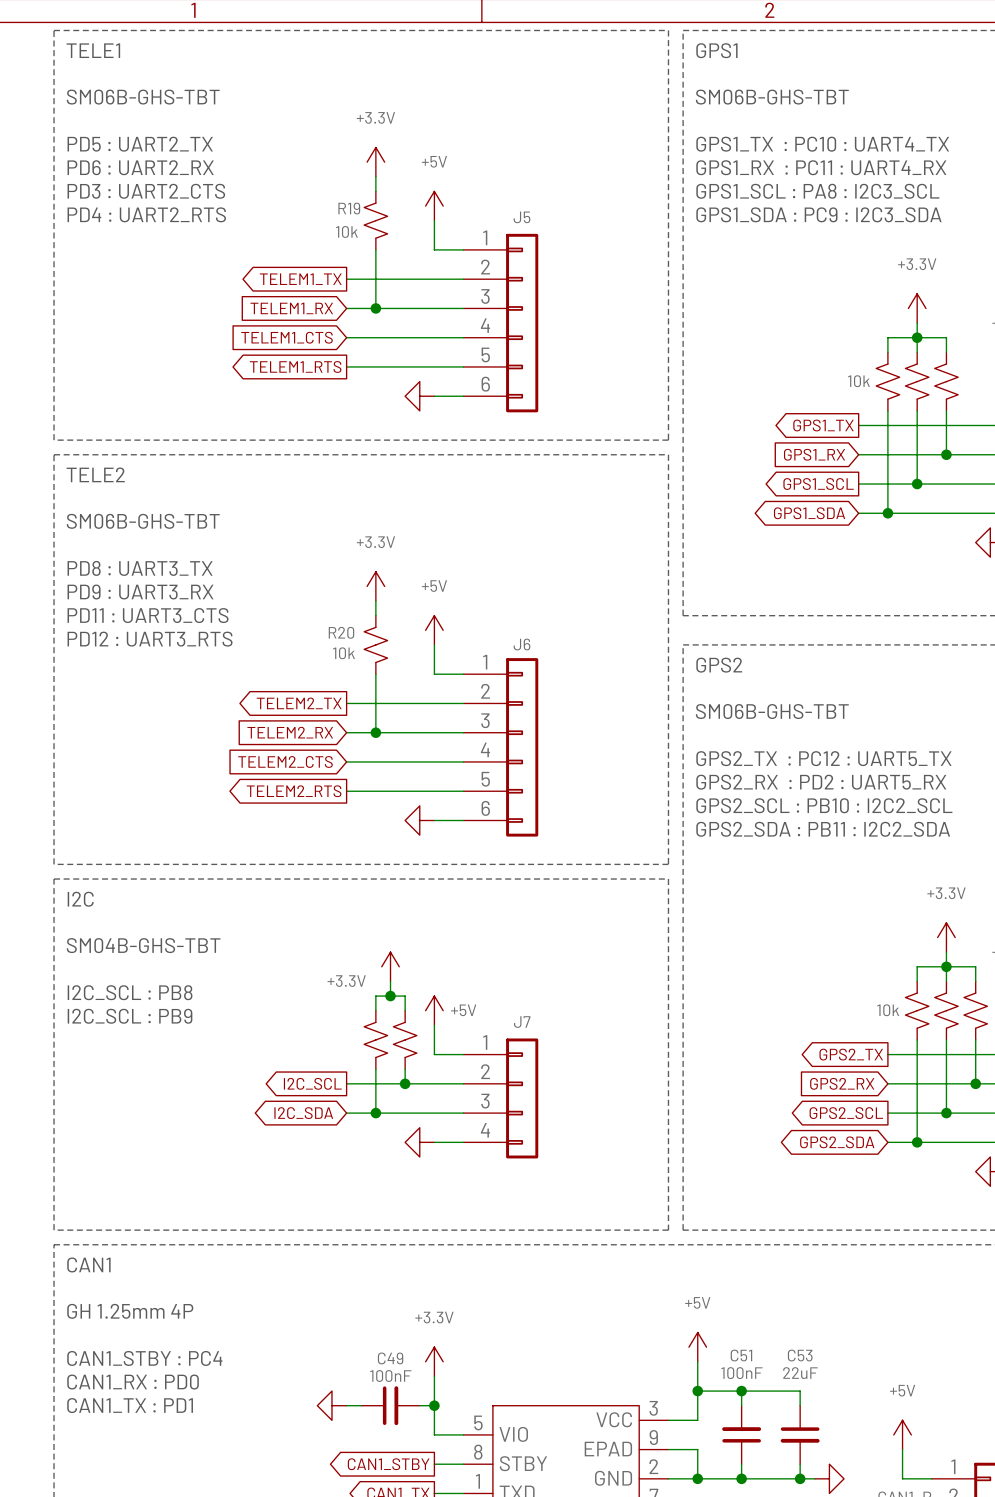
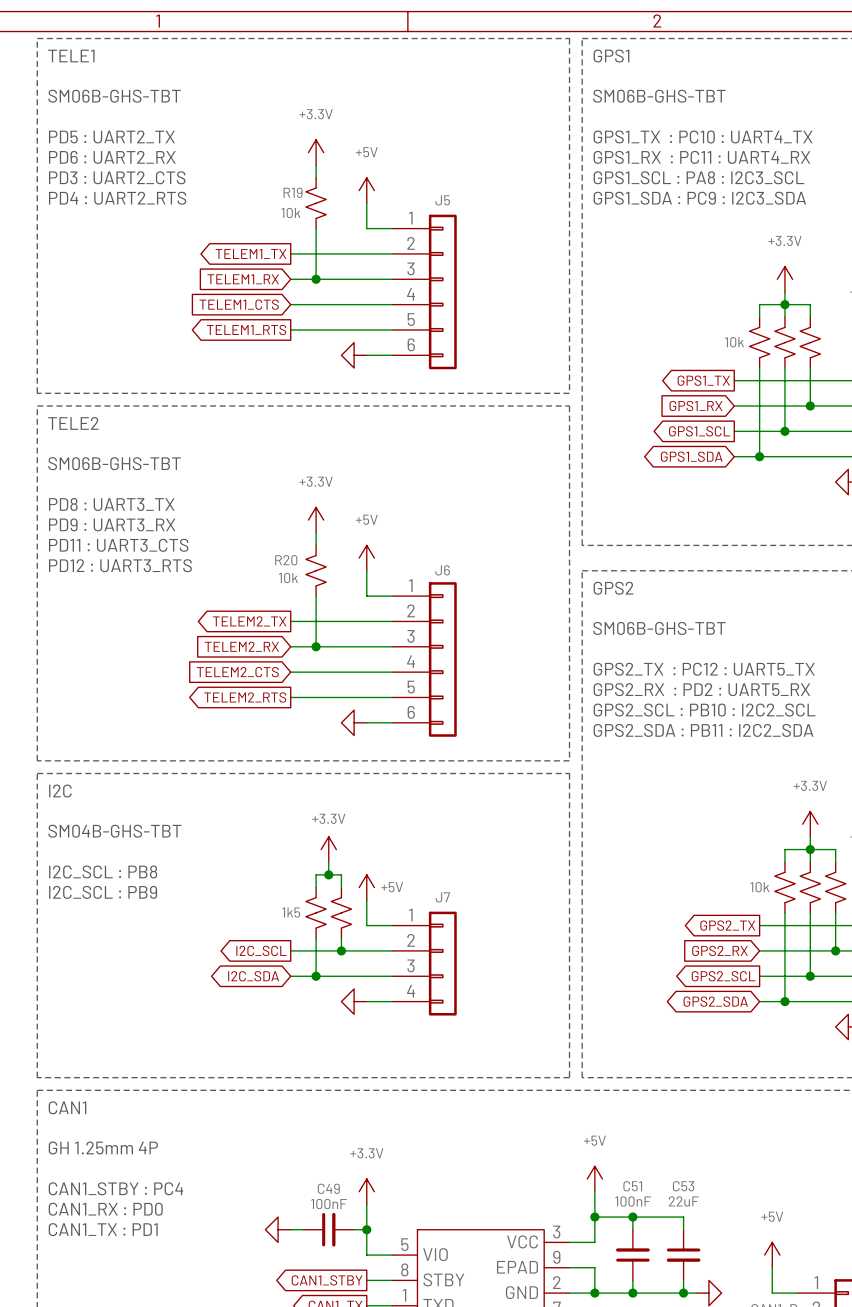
power symbol text position: +3.3V (346, 981) -> +3.3V (328, 818)
part value: none -> 1k5 (291, 912)

